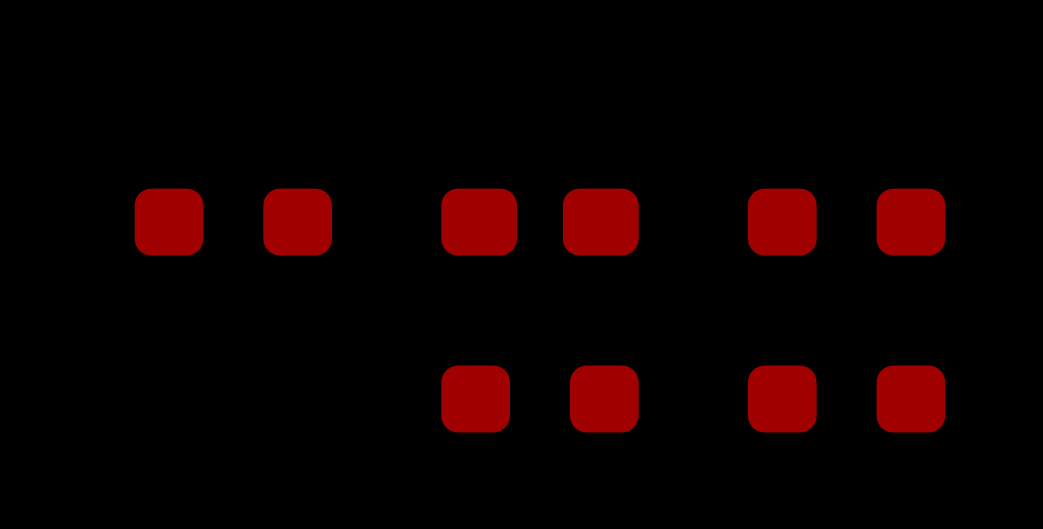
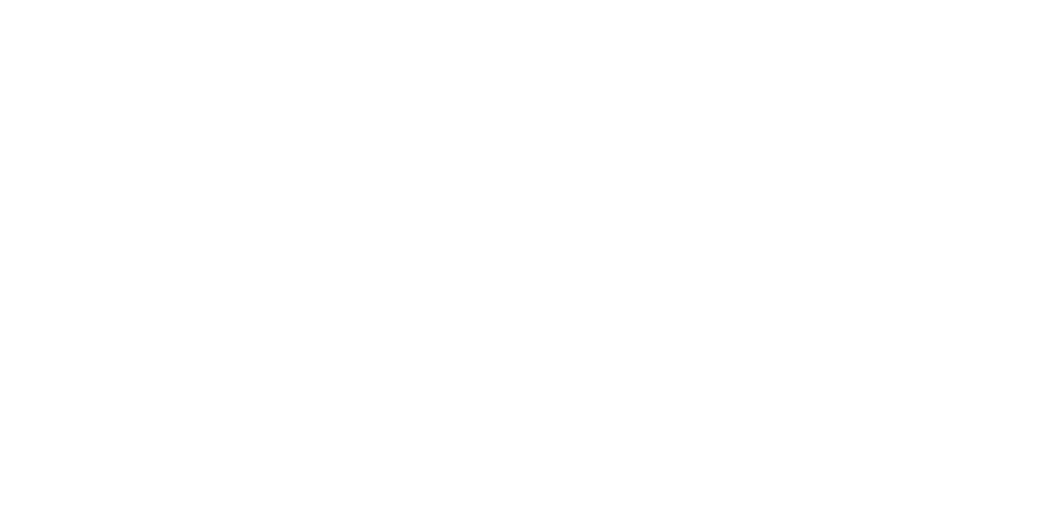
part: (233, 222) -> none
part: (539, 222) -> none
part: (846, 222) -> none
part: (539, 399) -> none
part: (846, 399) -> none

